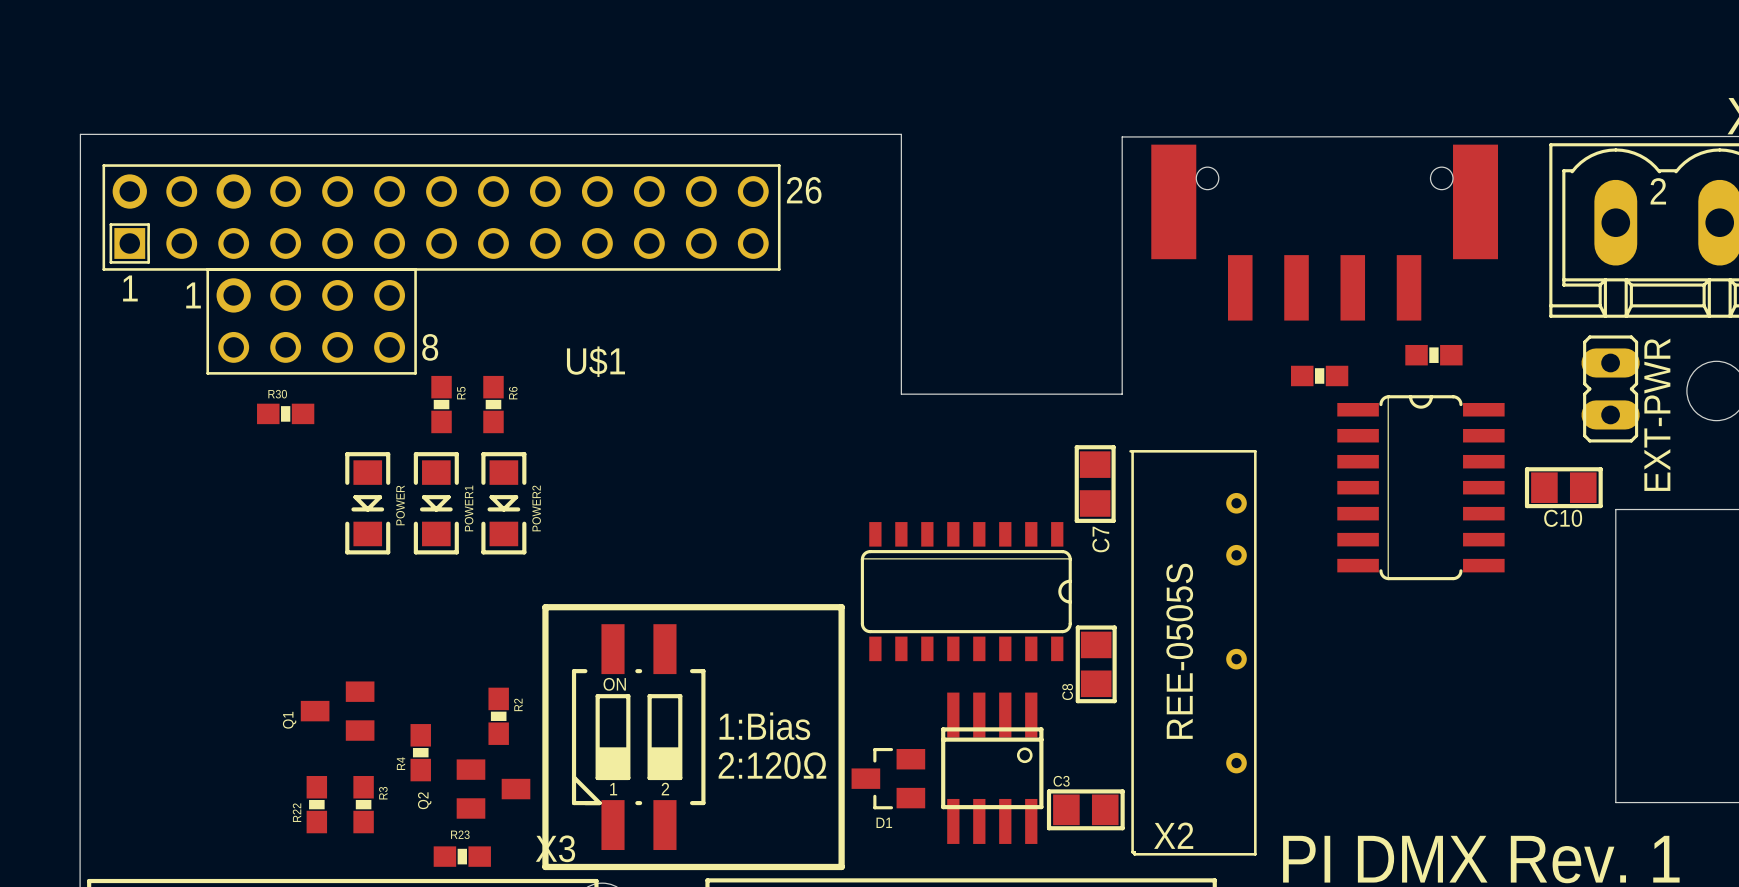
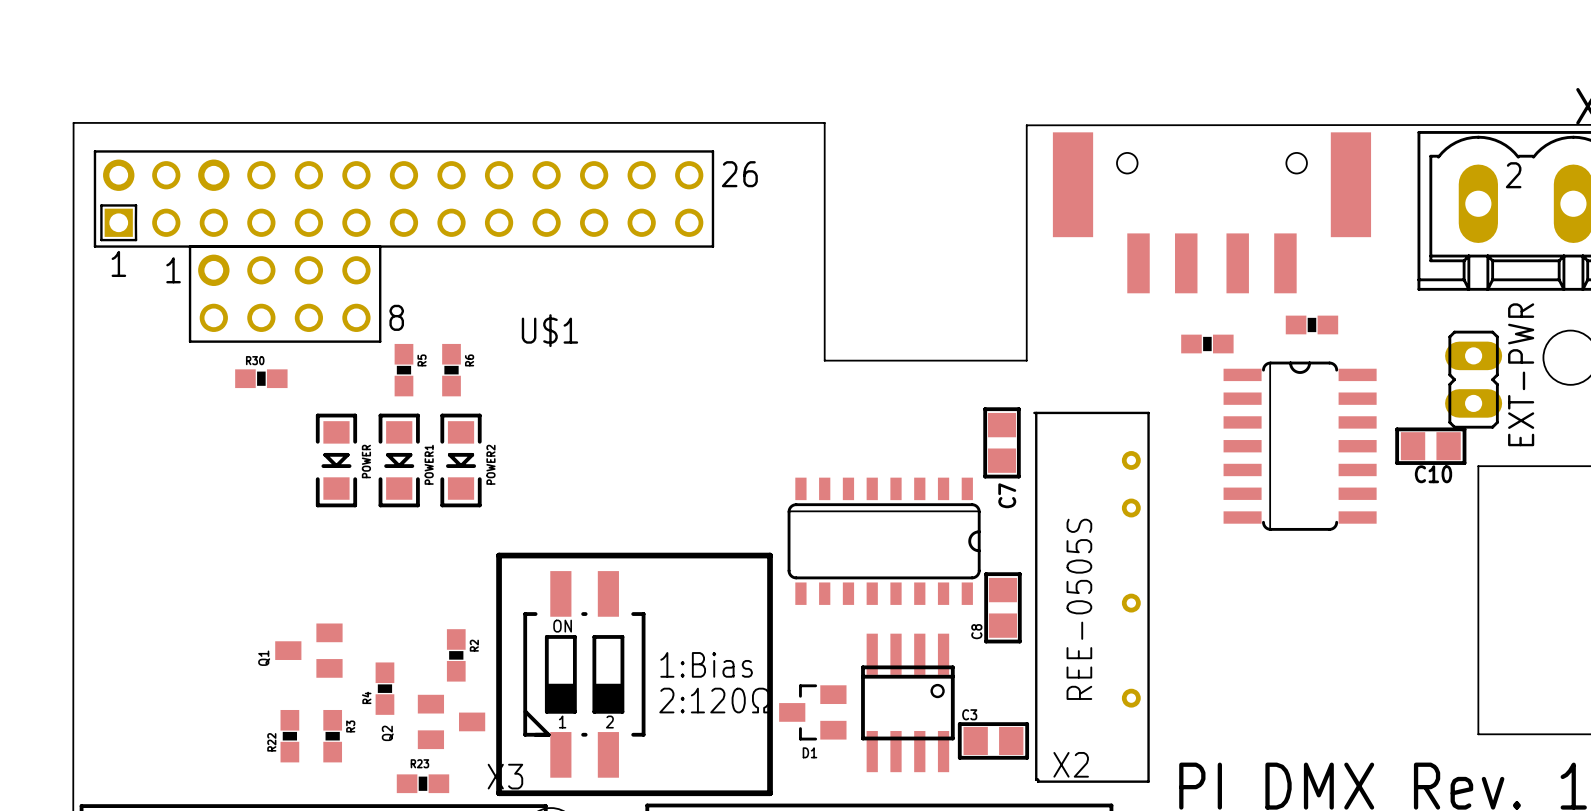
part footprint: [1151, 144, 1499, 321] -> [1052, 132, 1372, 294]
EXT-PWR: (1610, 388) -> none
EXT-PWR: none -> (1473, 379)

